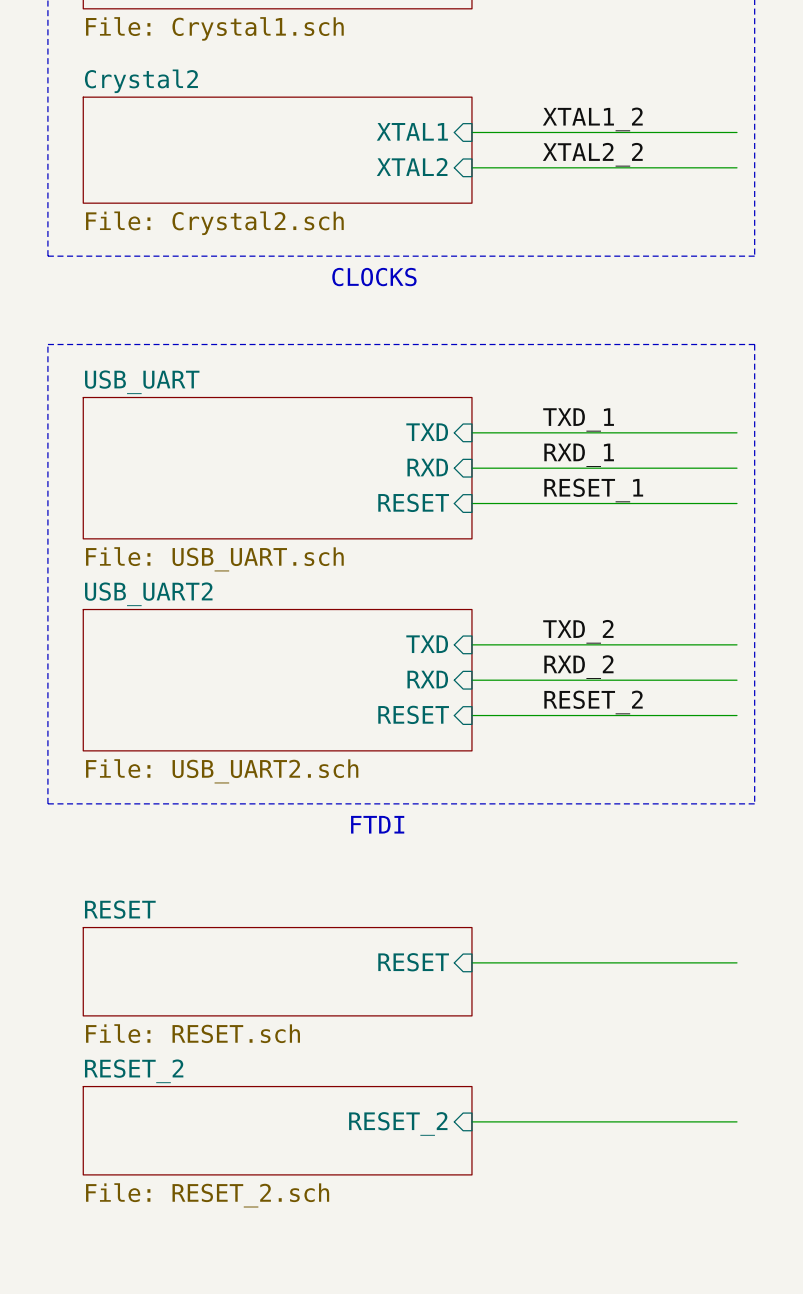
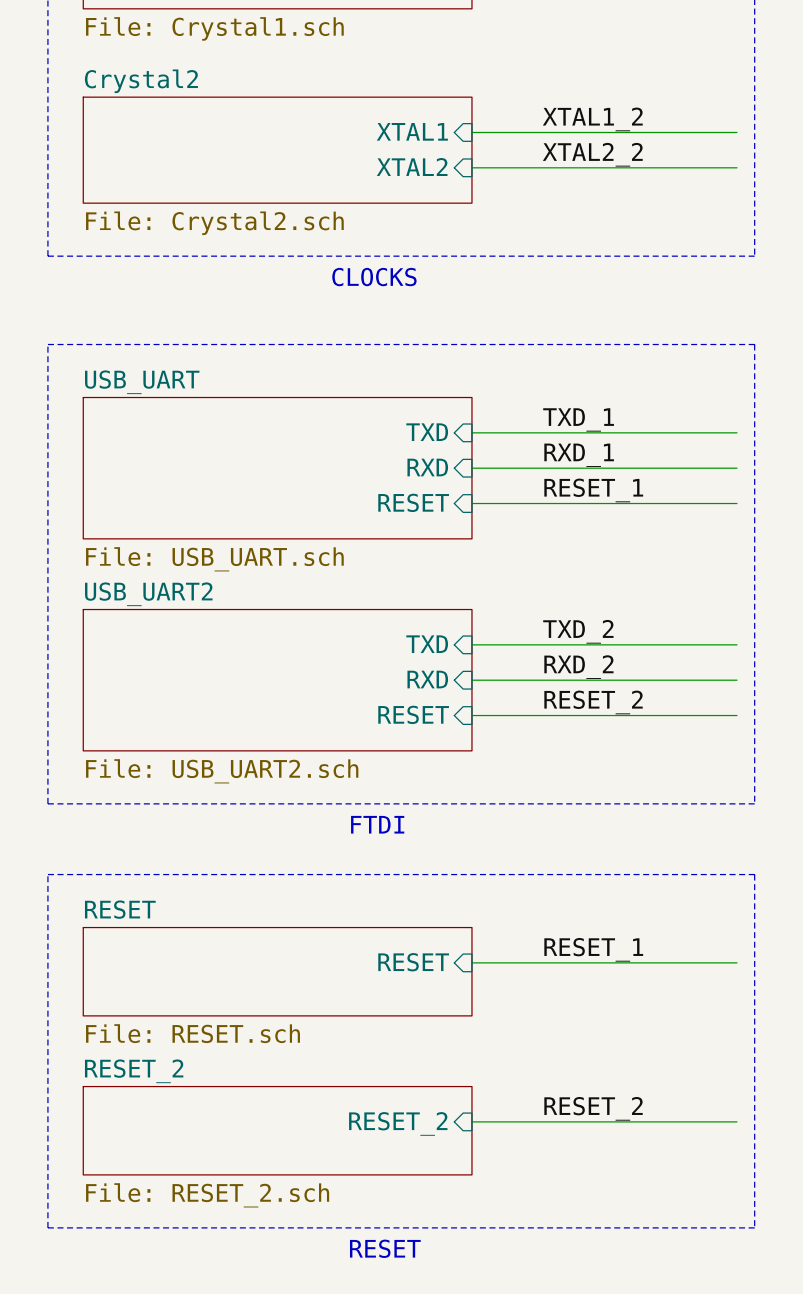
line: none -> (47, 874) (754, 874) (754, 1227) (47, 1227) (47, 874)
label: none -> RESET_1 (593, 949)
label: none -> RESET_2 (593, 1108)
text: none -> RESET (385, 1248)

